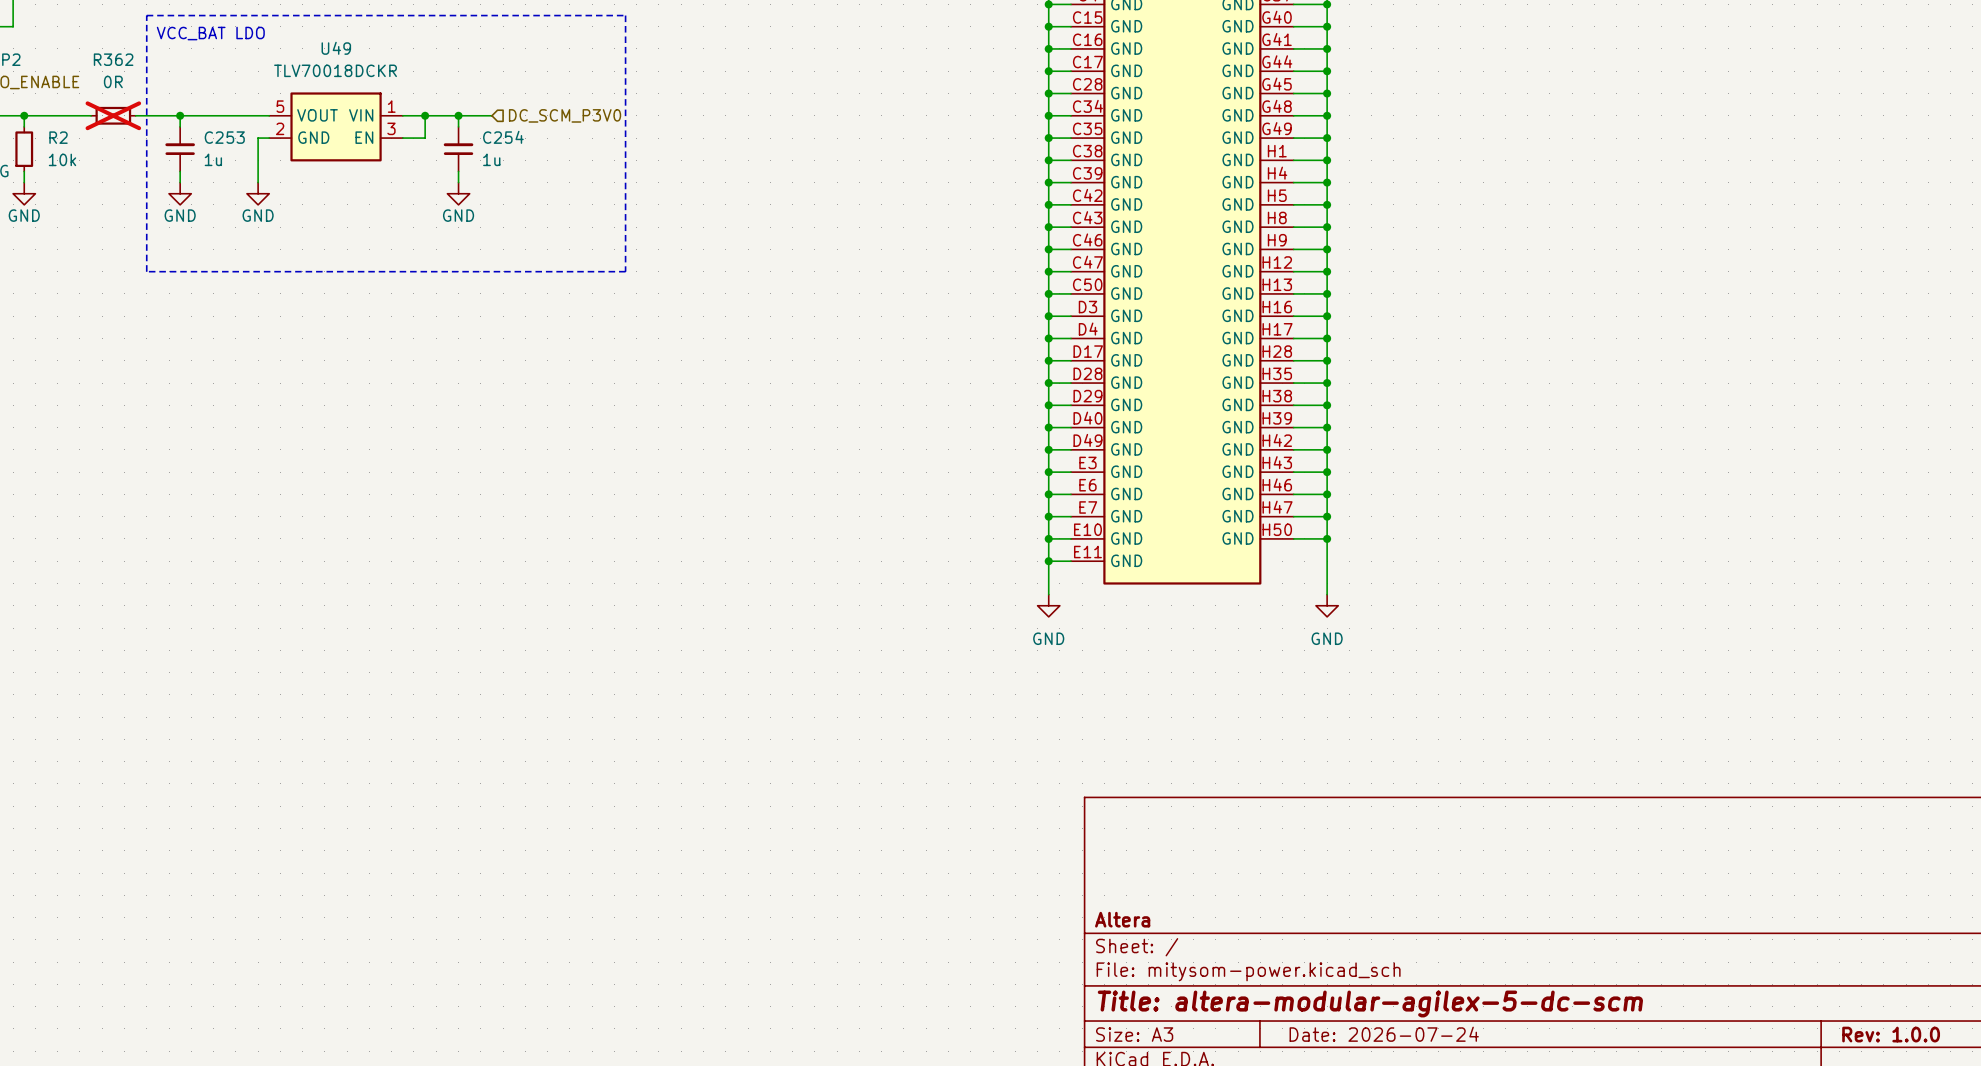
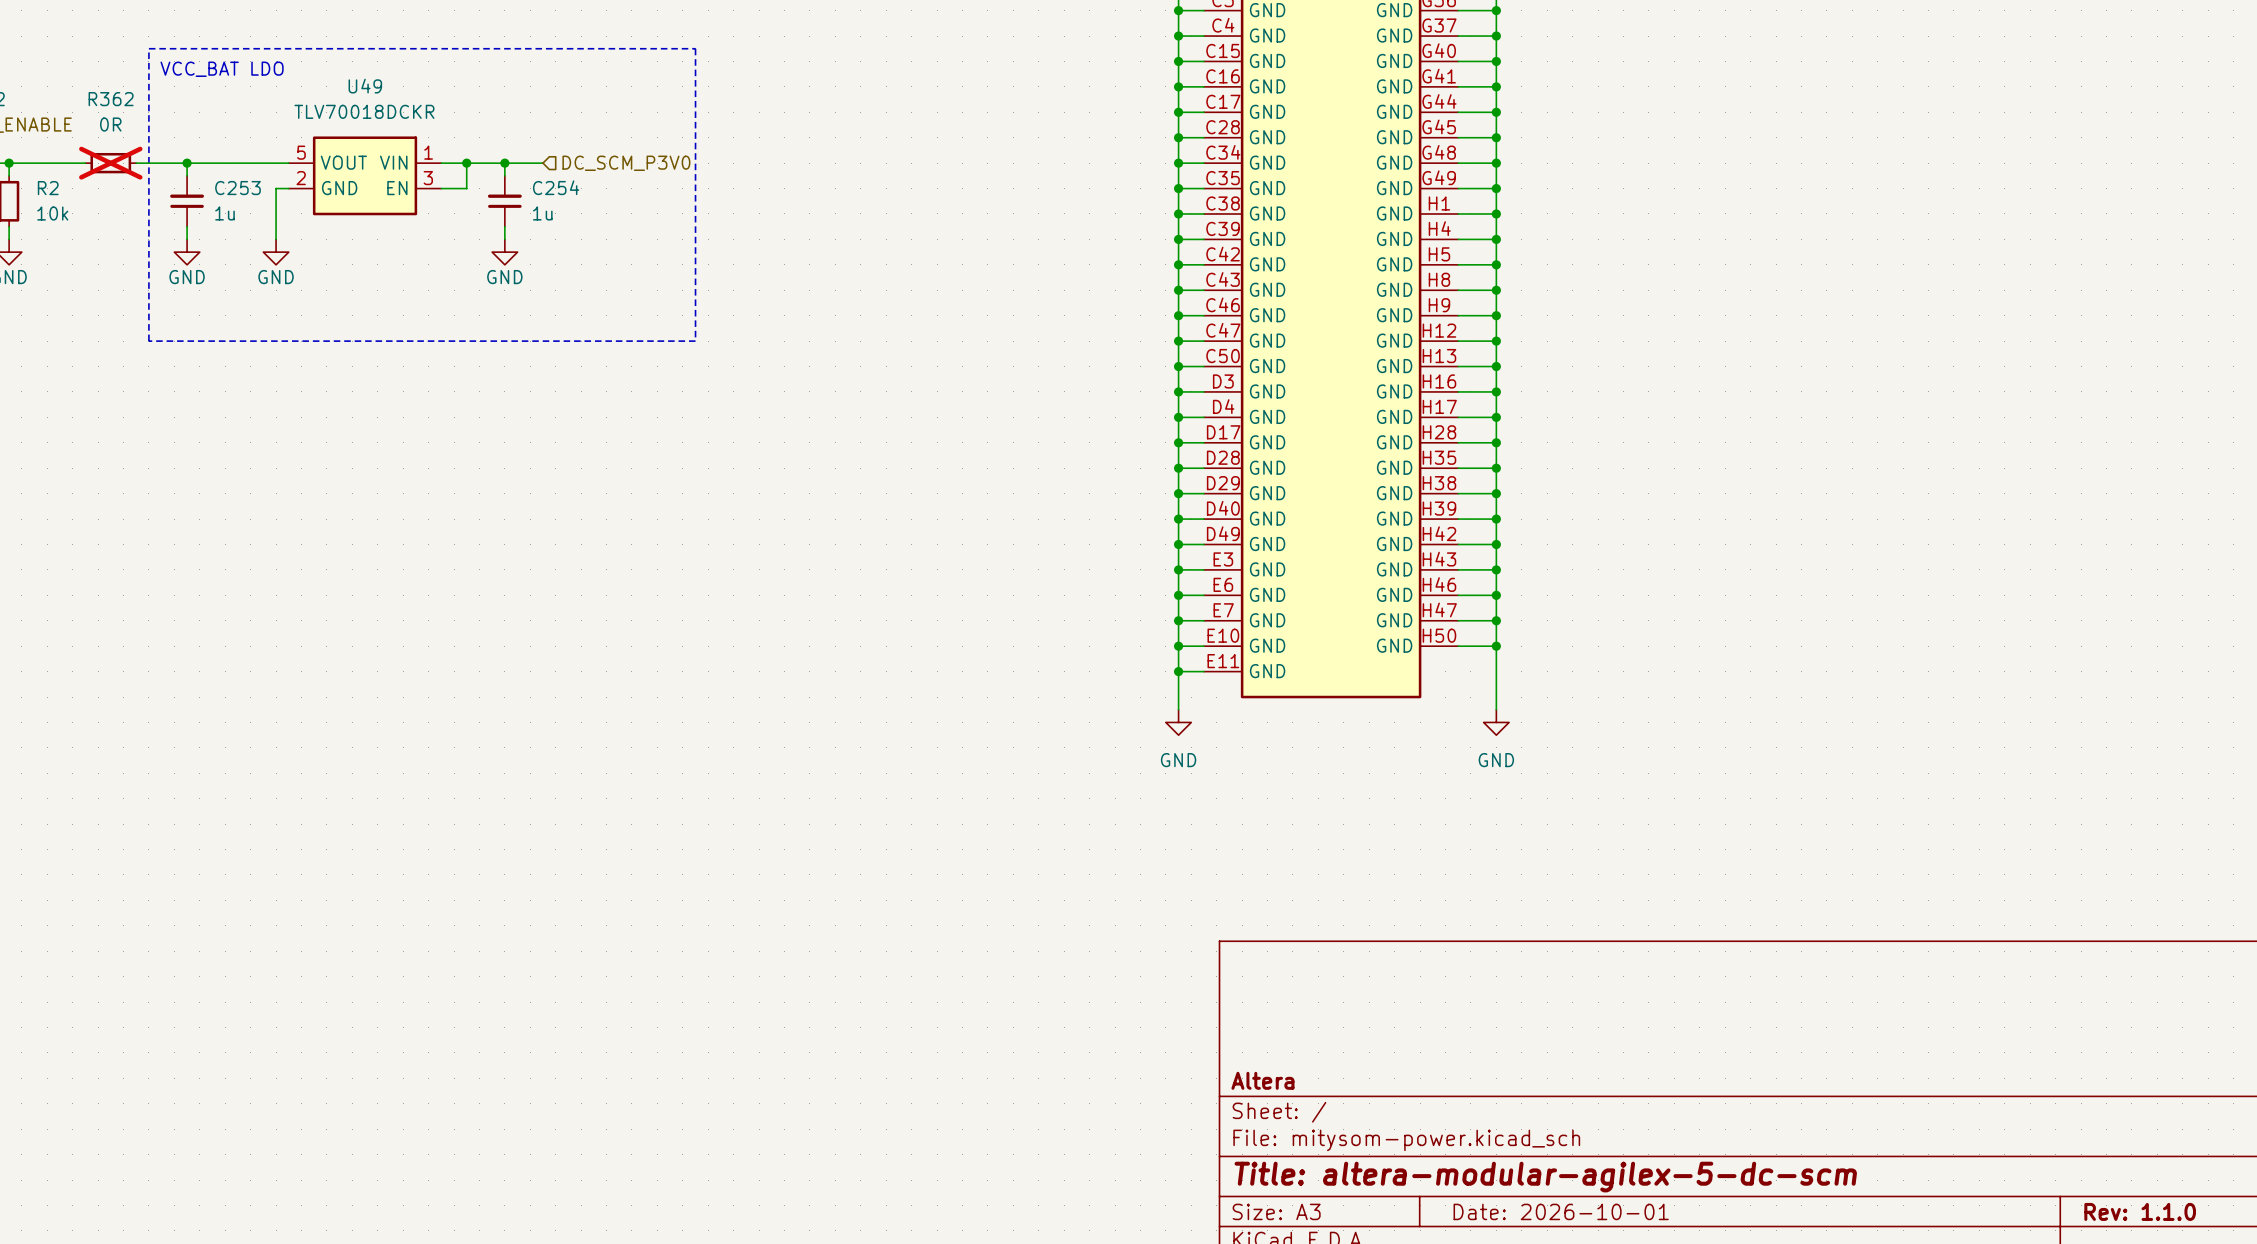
title block: Date: 2026-07-24 (1384, 1034) -> Date: 2026-10-01 (1561, 1211)
title block: Rev: 1.0.0 (1891, 1034) -> Rev: 1.1.0 (2140, 1211)

